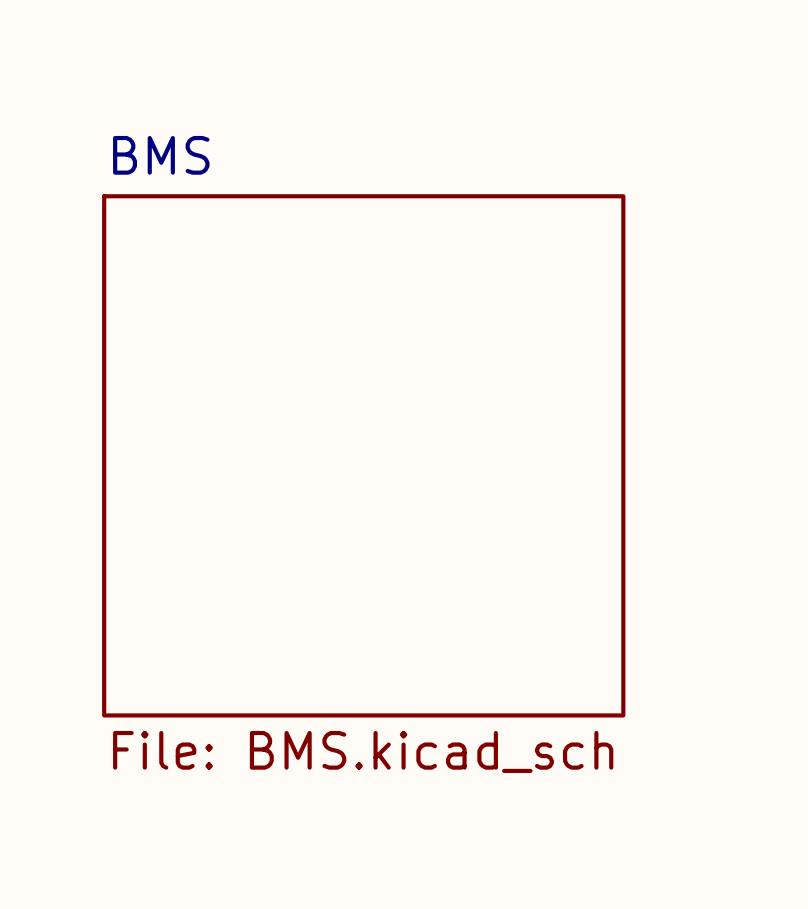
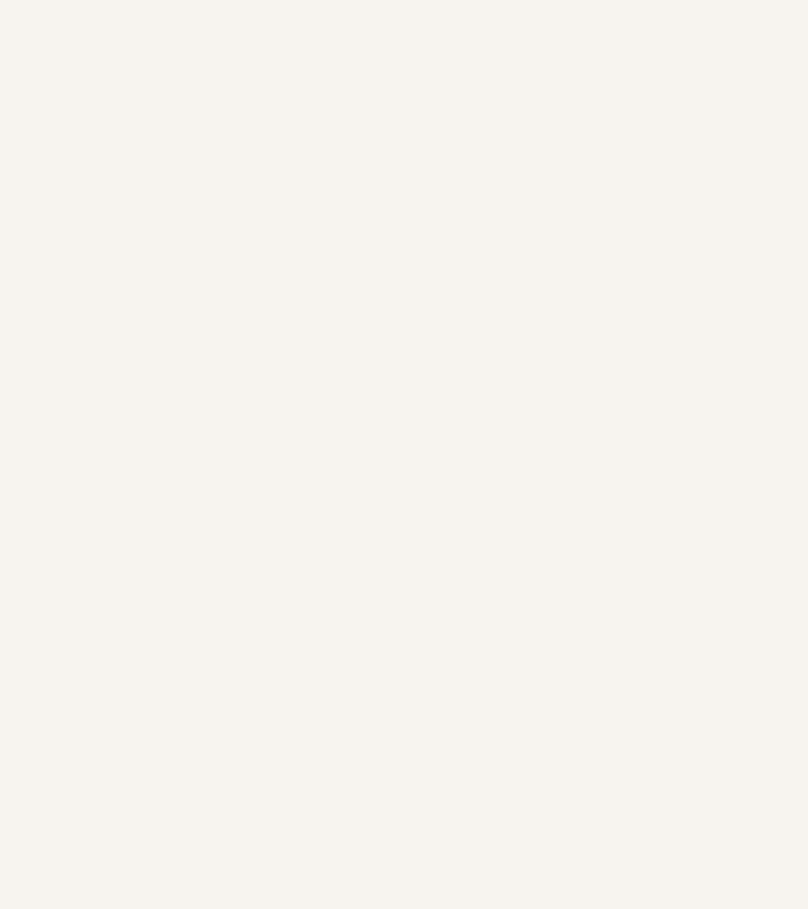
sheet BMS: File: BMS.kicad_sch (363, 455) -> none

